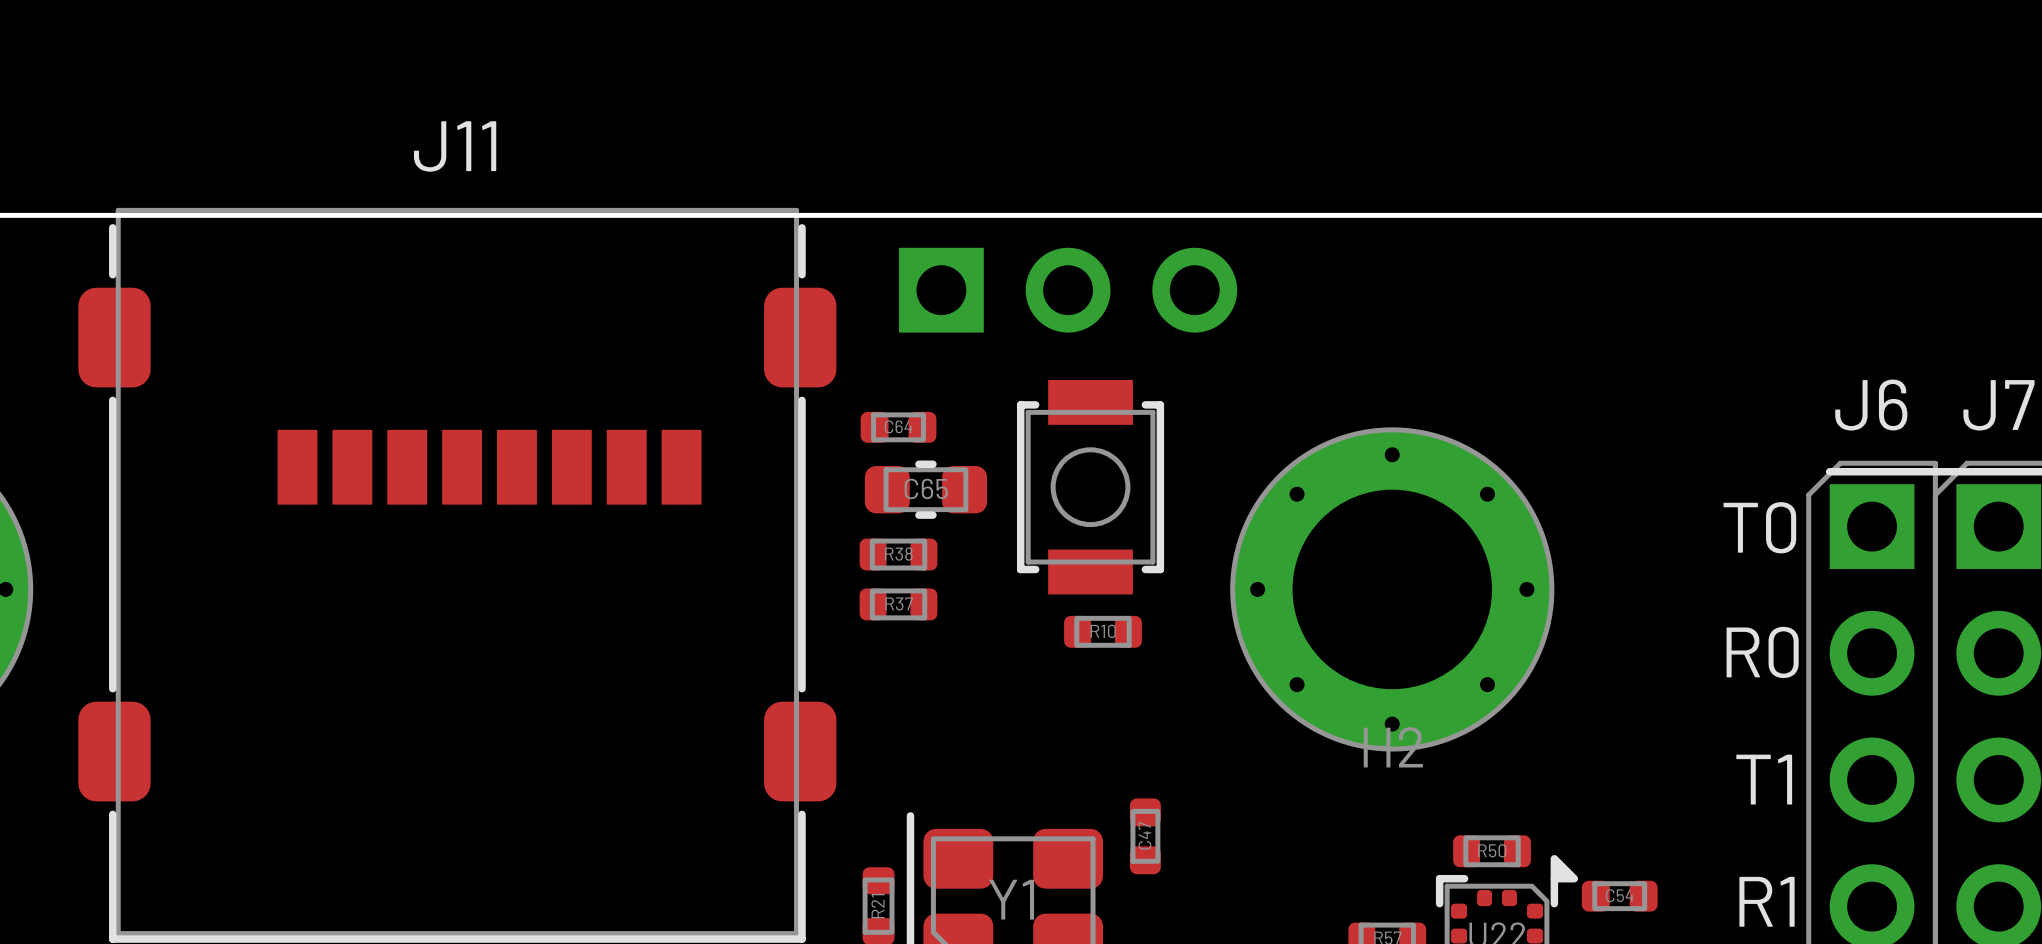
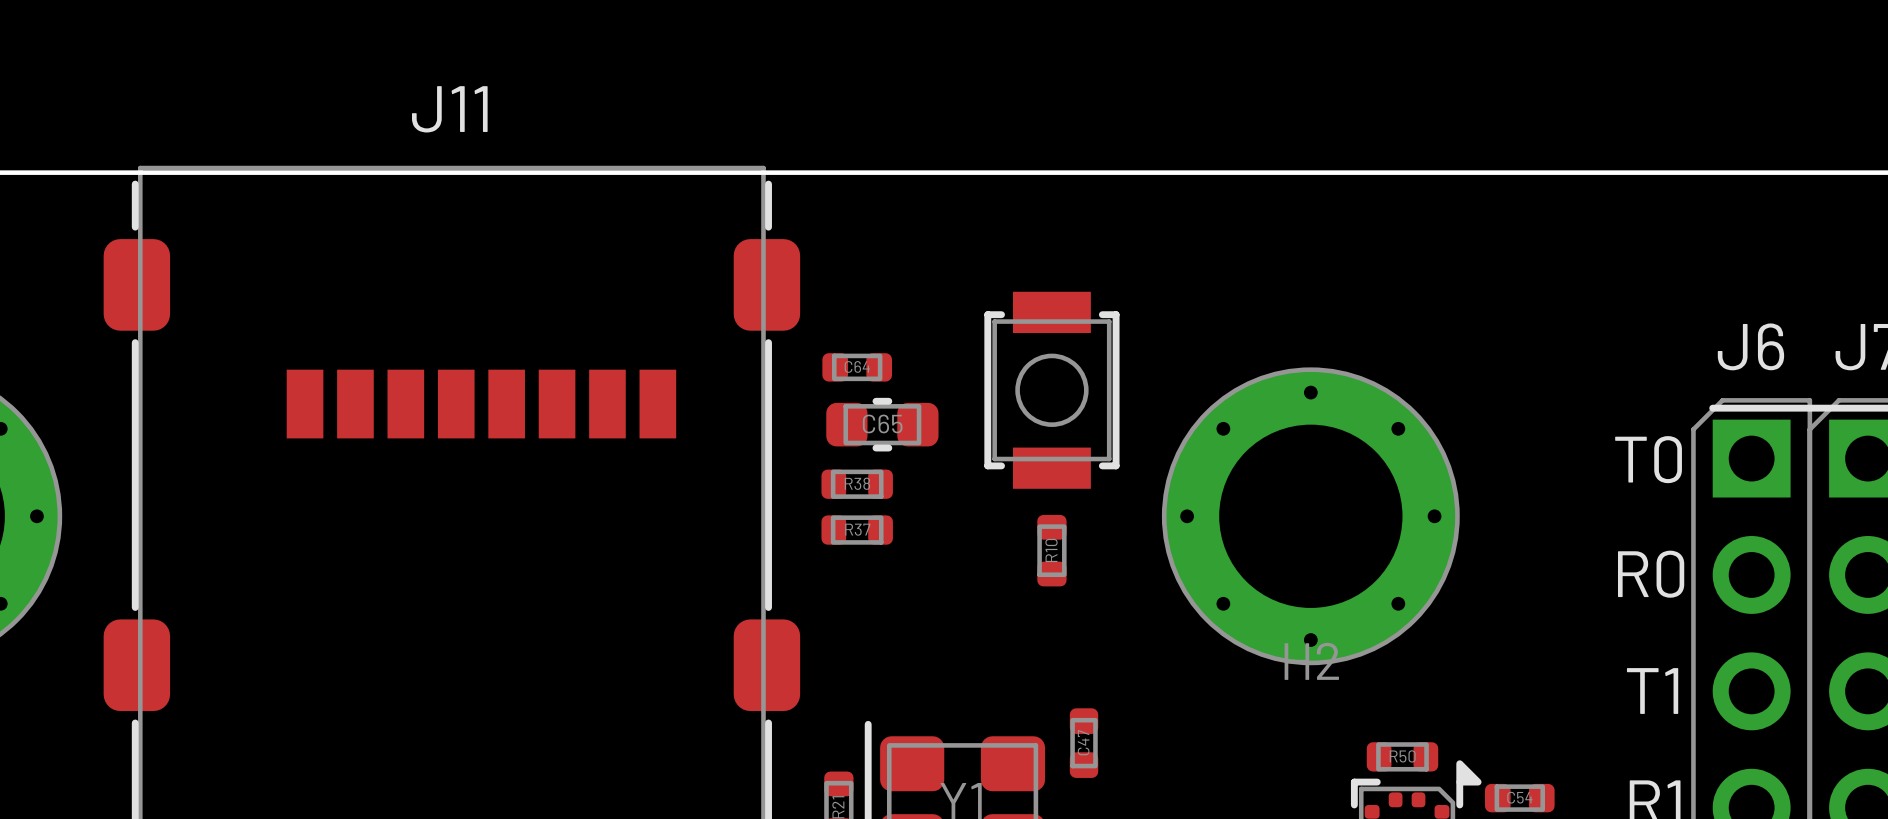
part: (1068, 290) -> none
part position: (1090, 487) -> (1051, 390)
R10 rotation: 0° (1103, 631) -> 90° clockwise (1051, 550)

